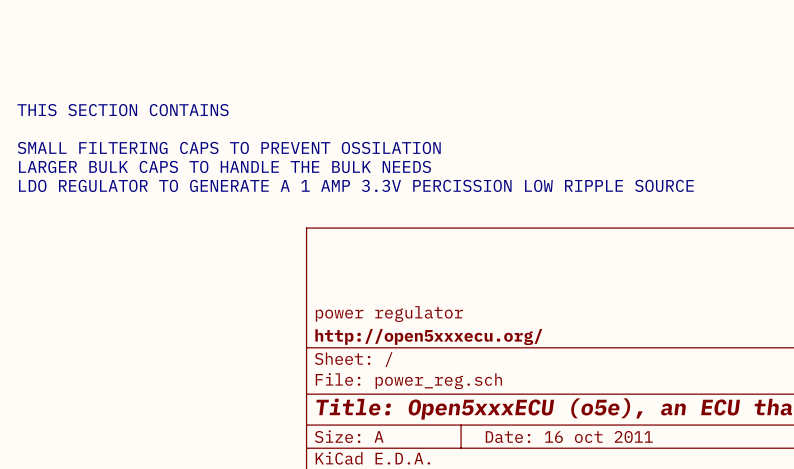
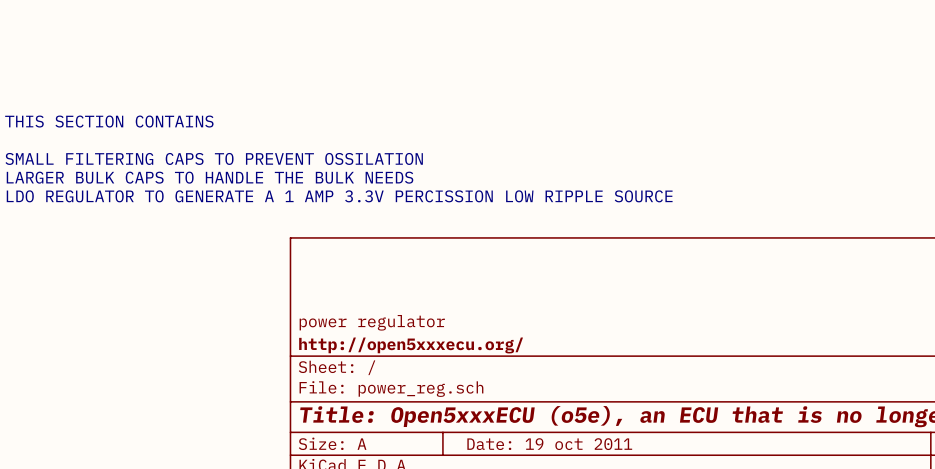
title block: Date: 16 oct 2011 (569, 436) -> Date: 19 oct 2011 (549, 444)

